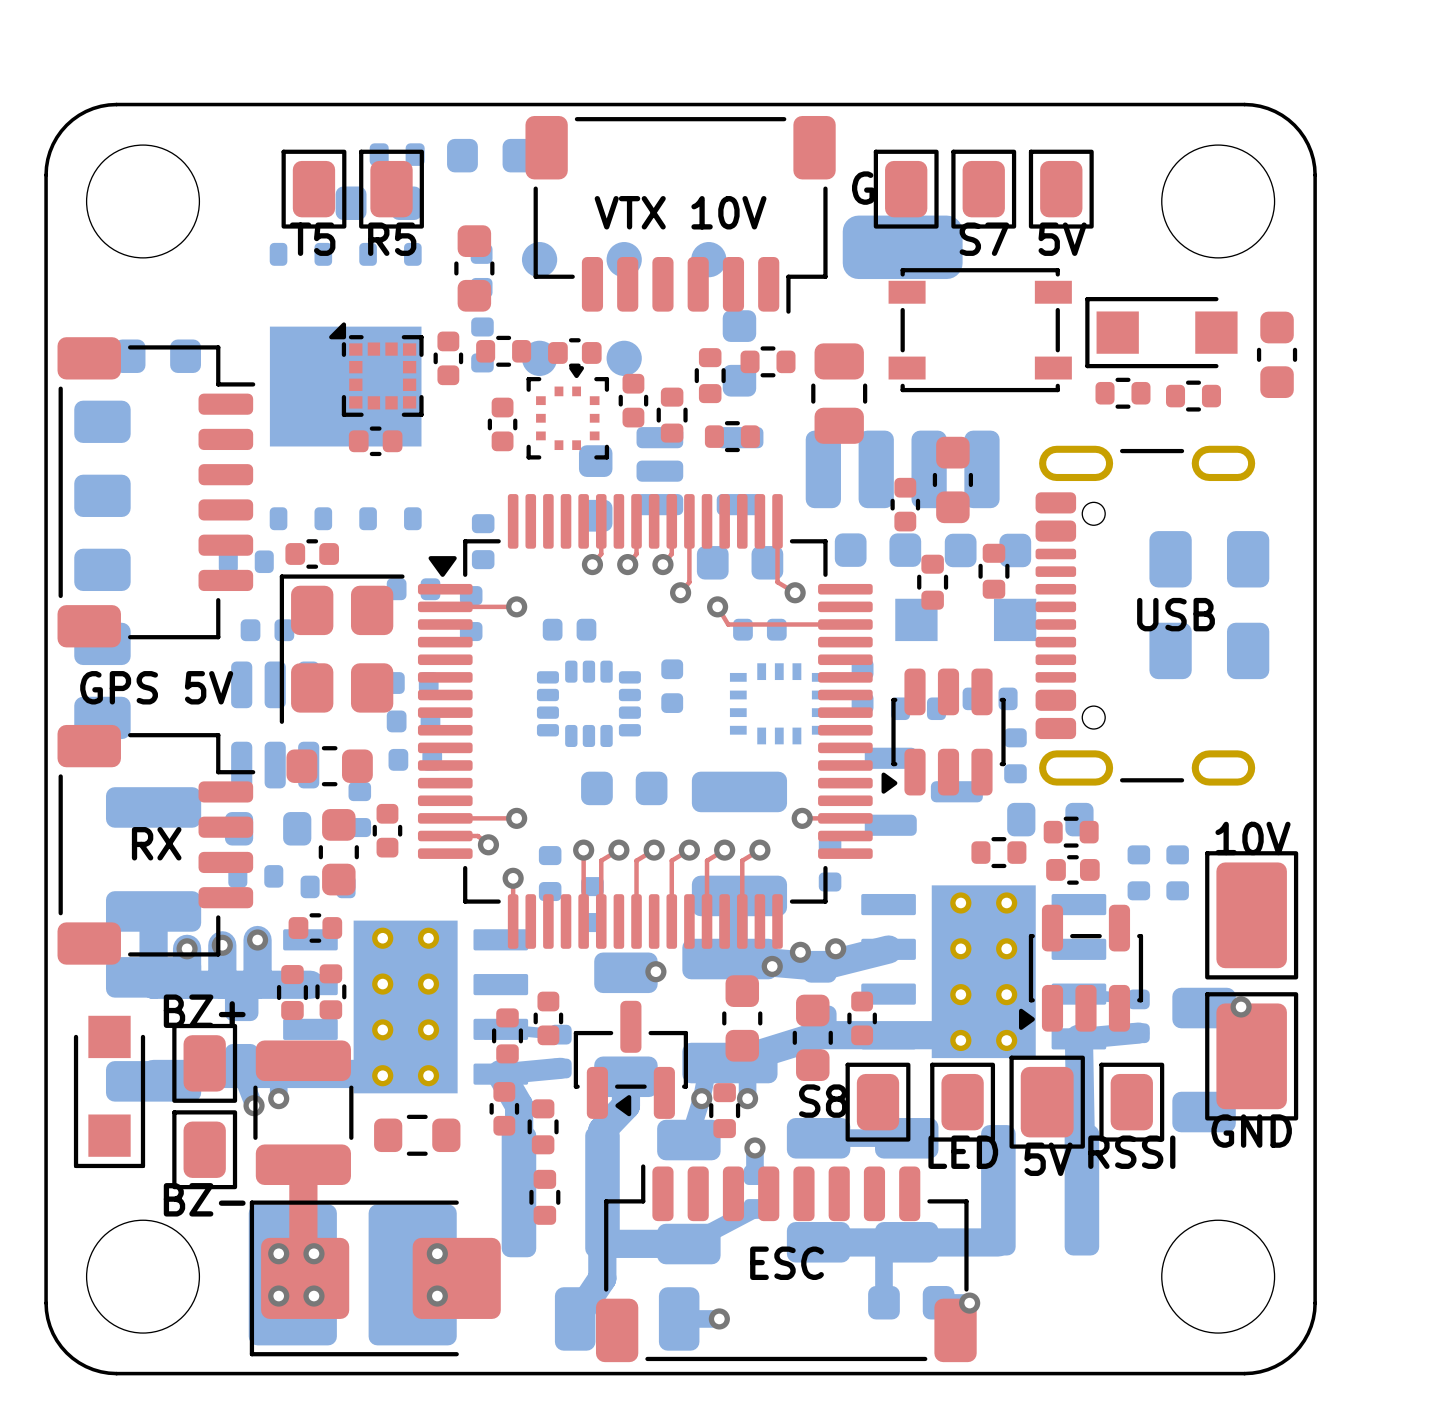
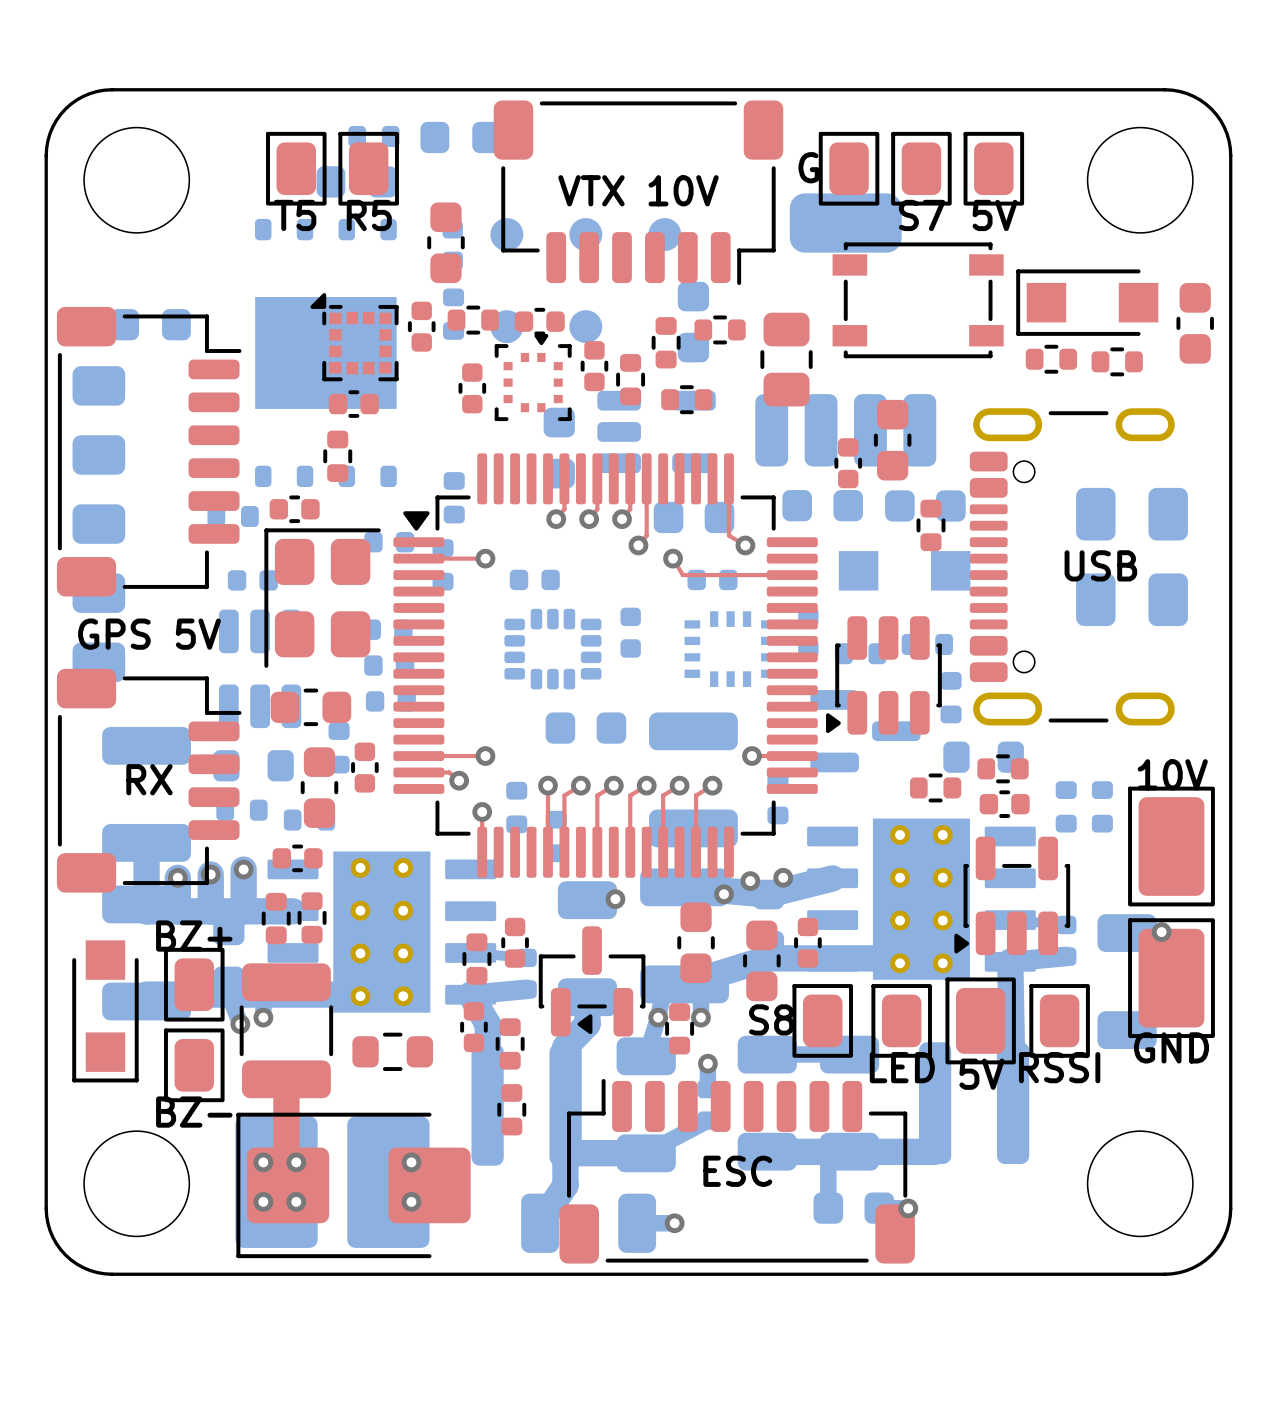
part position: (932, 582) -> (337, 456)

